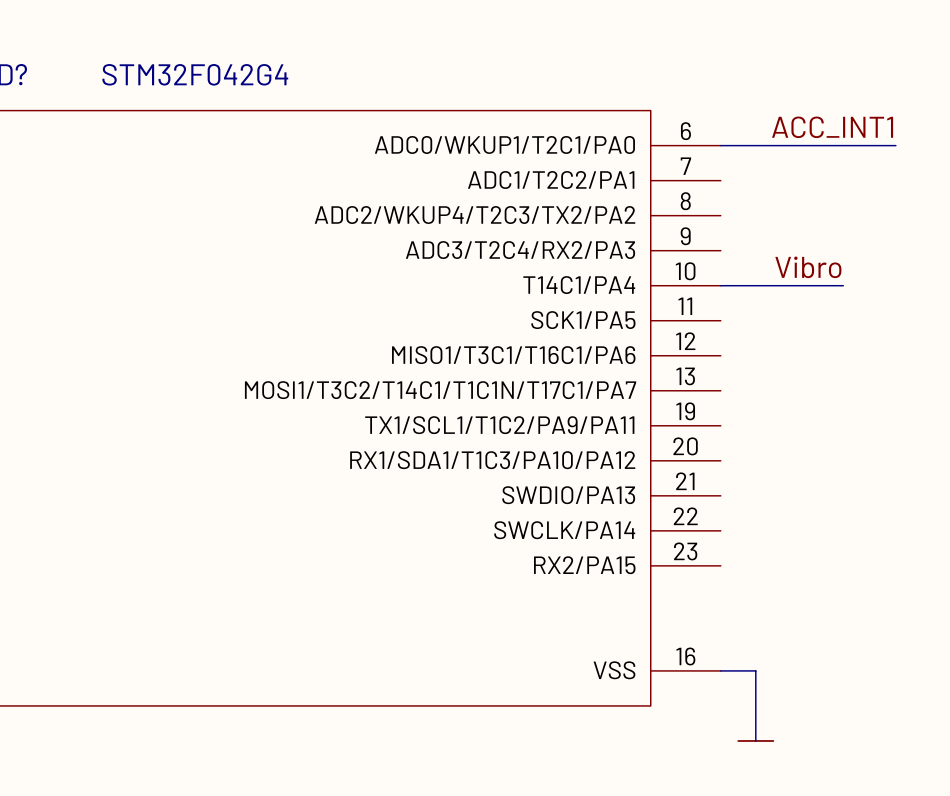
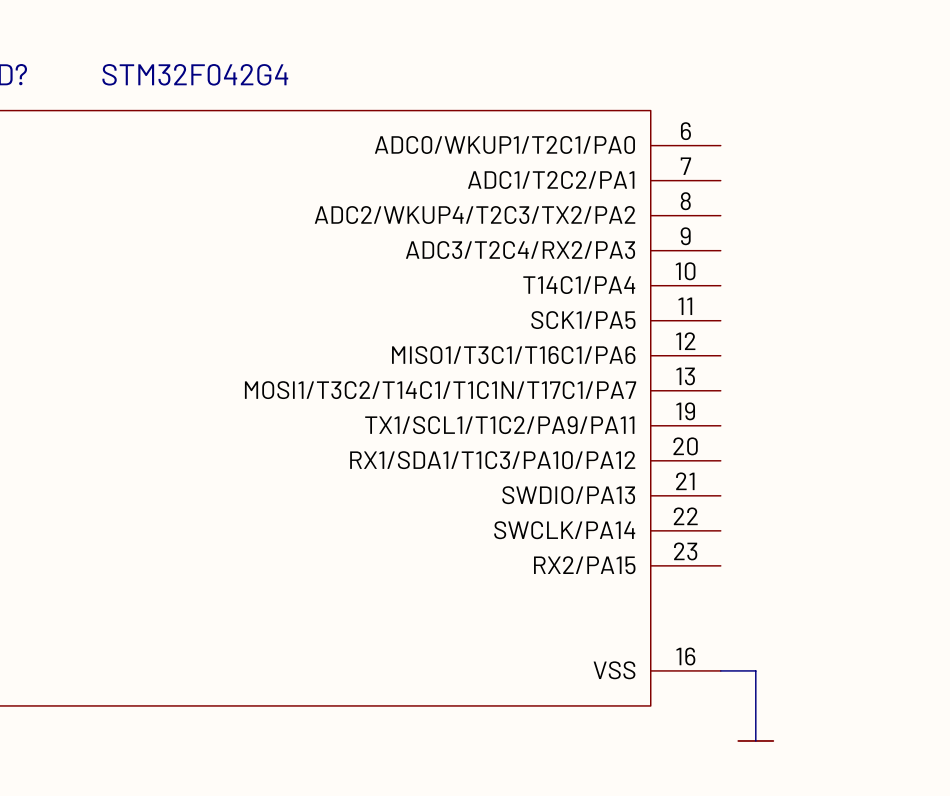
label: ACC_INT1 (832, 127) -> none
wire: (720, 145) (895, 145) -> none
label: Vibro (808, 267) -> none
wire: (720, 285) (843, 285) -> none

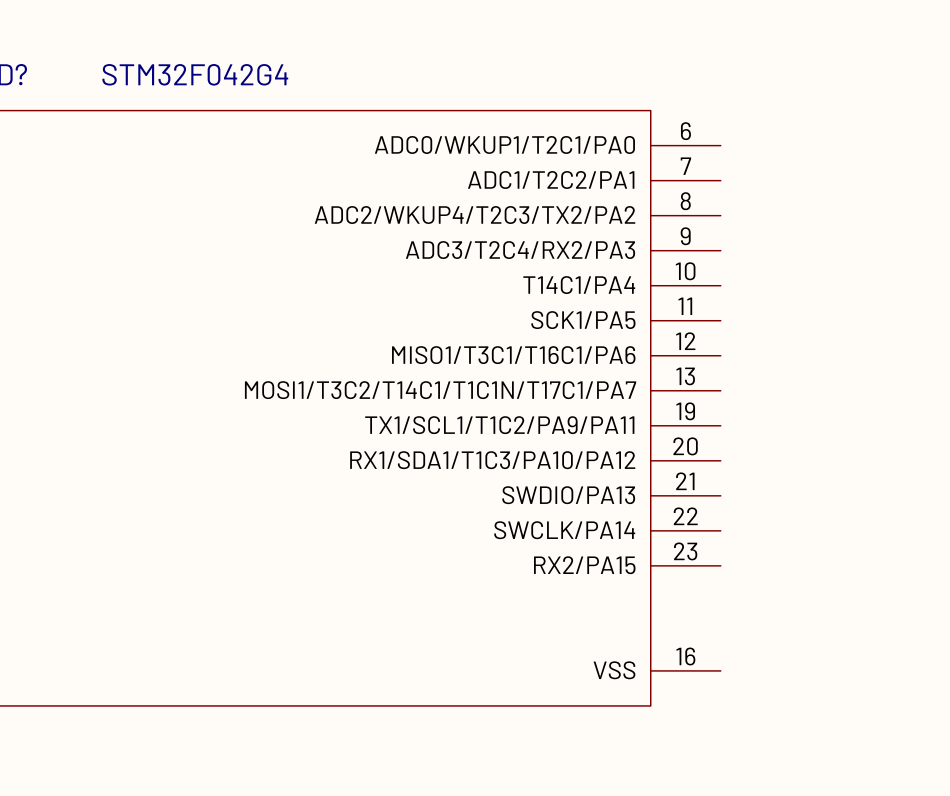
wire: (720, 670) (755, 670) (755, 740) -> none
power symbol: (755, 740) -> none

